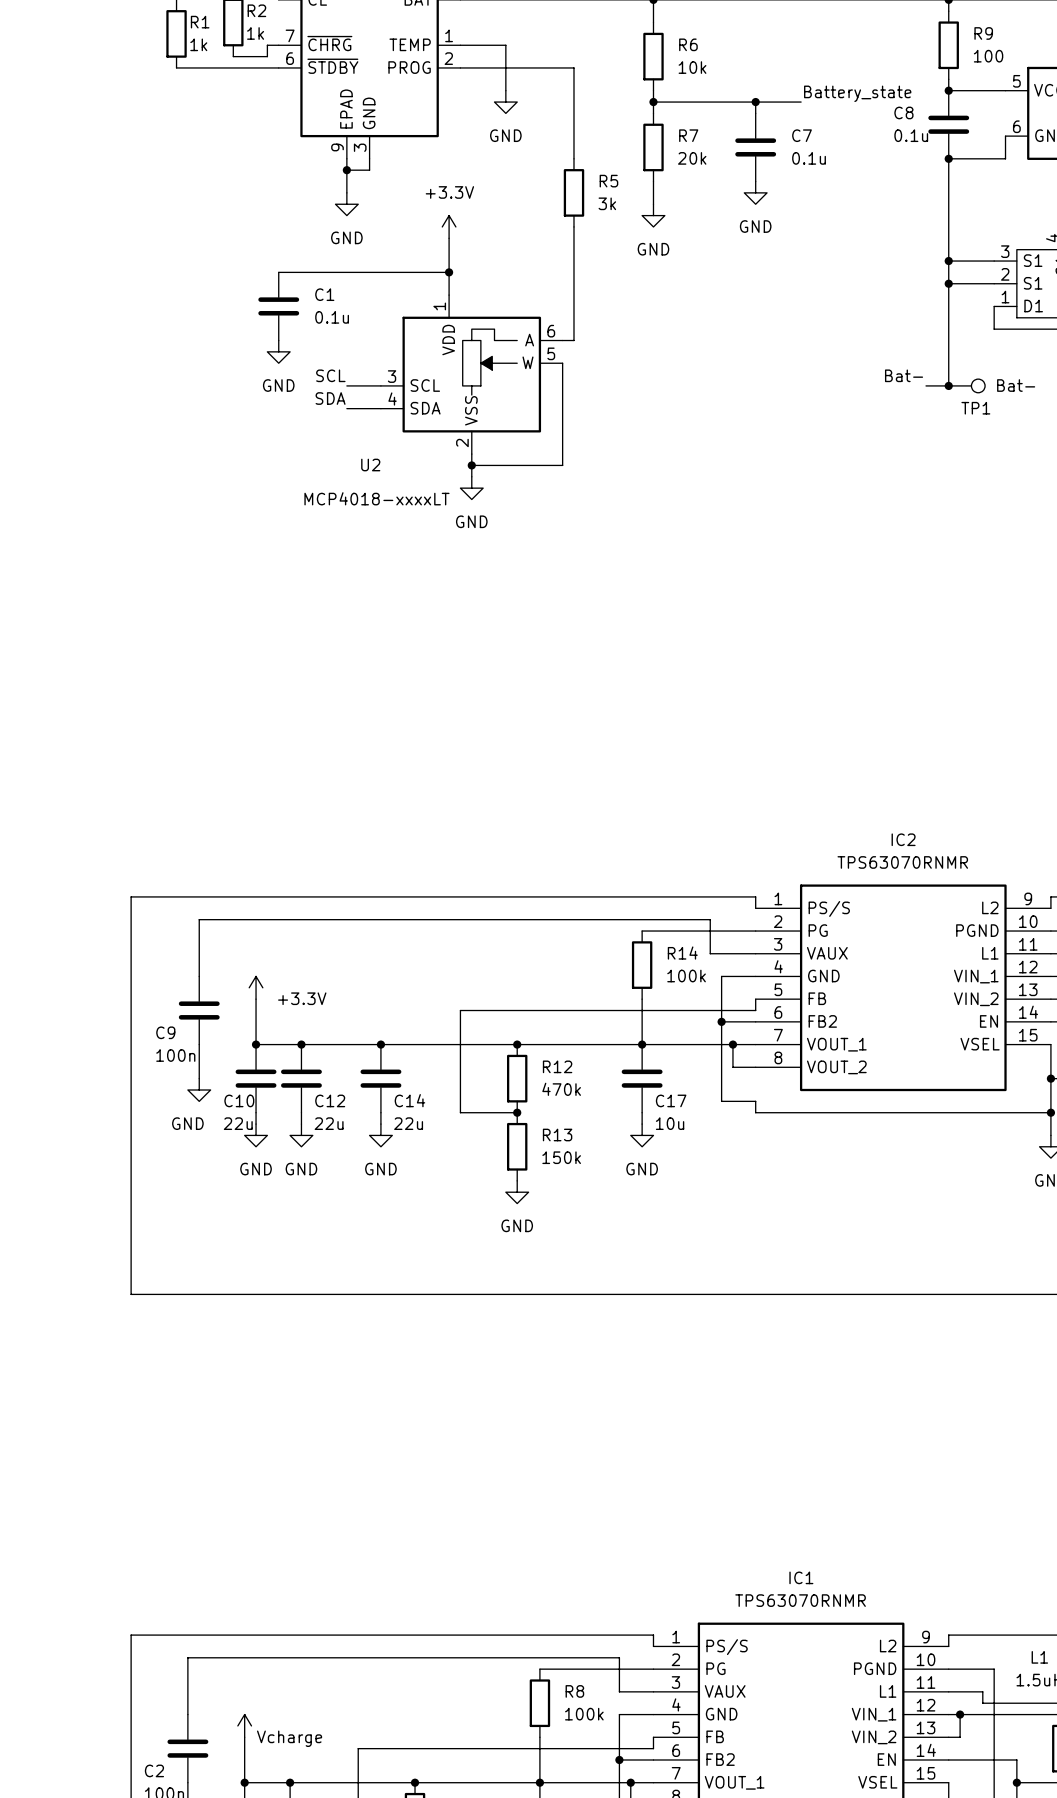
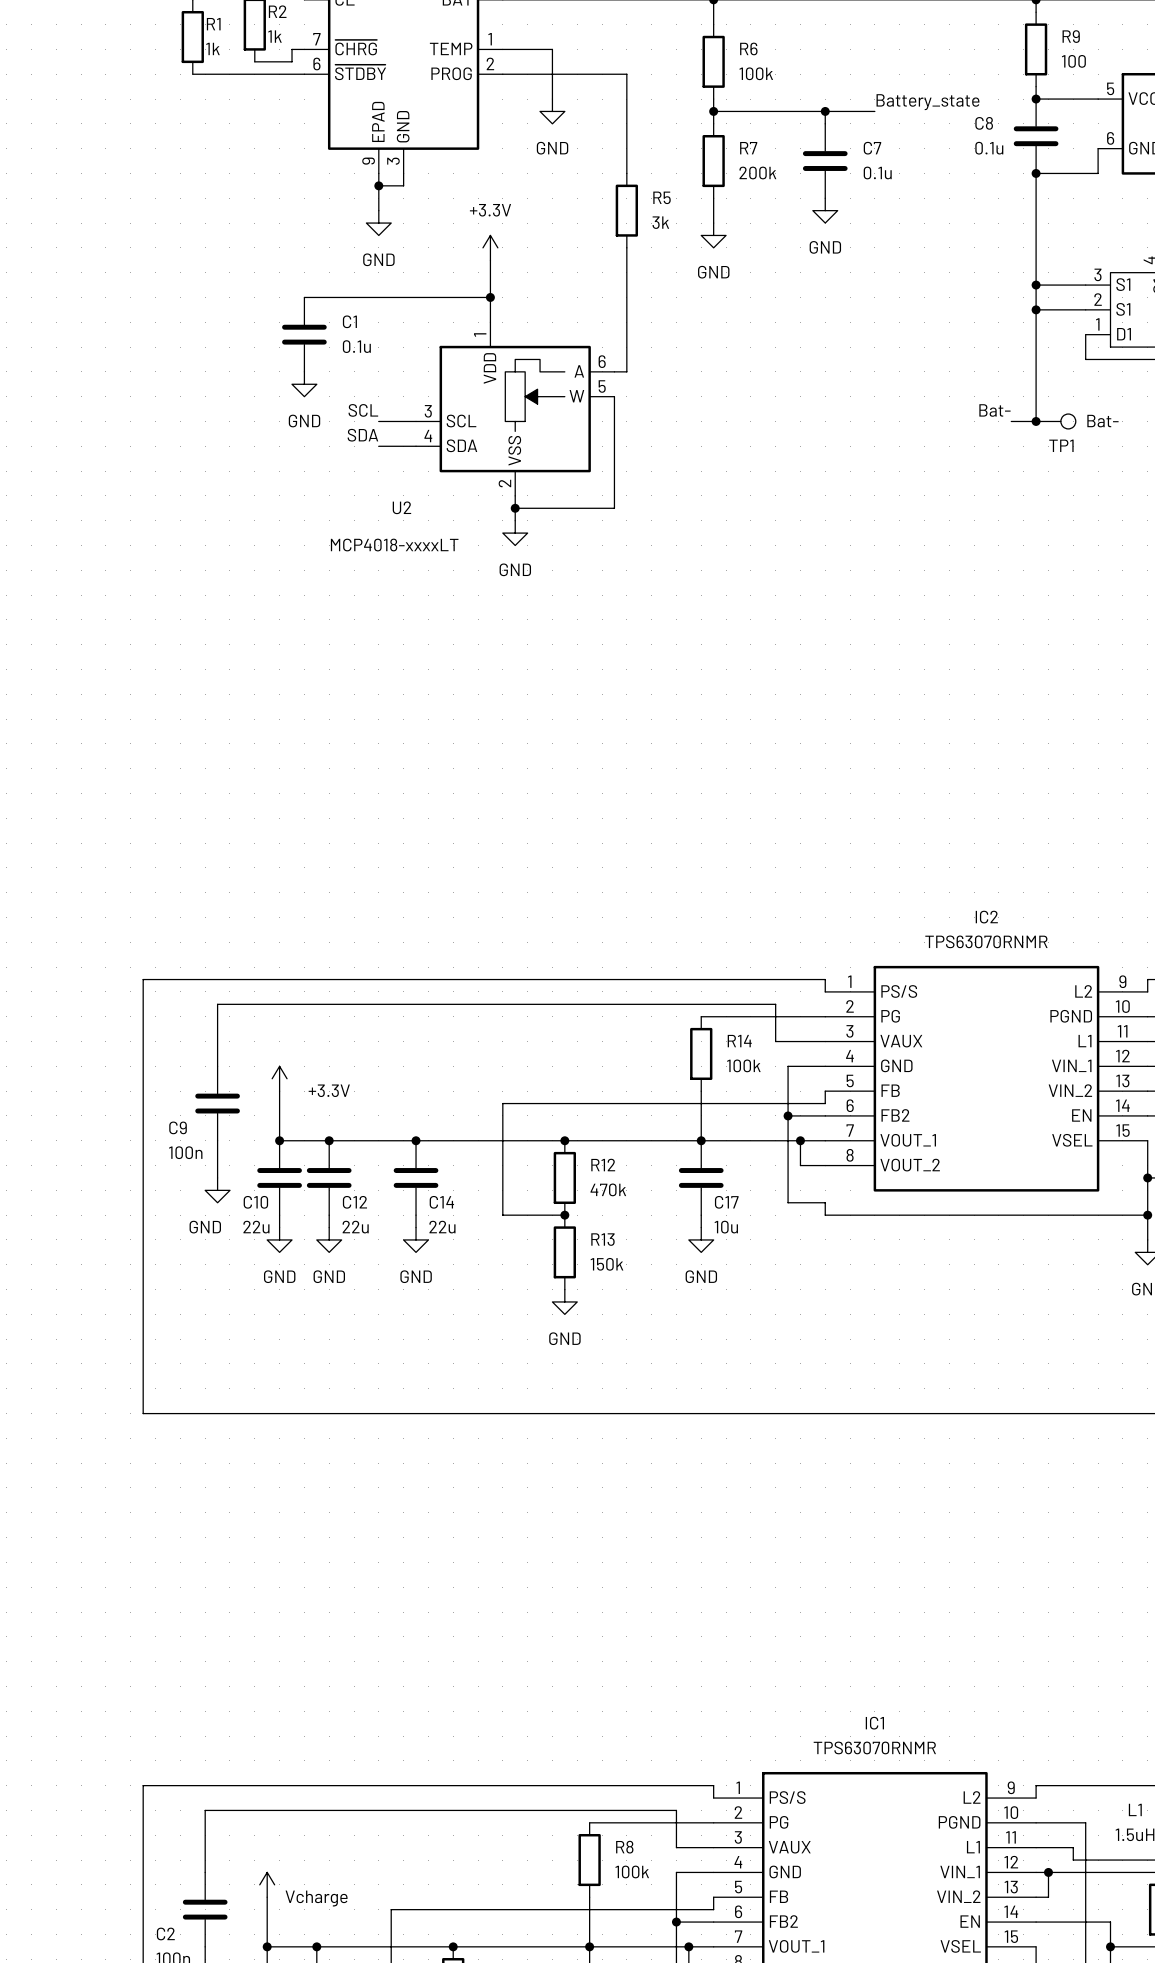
R6 value: 10k (692, 67) -> 100k (756, 73)
R7 value: 20k (692, 158) -> 200k (757, 172)

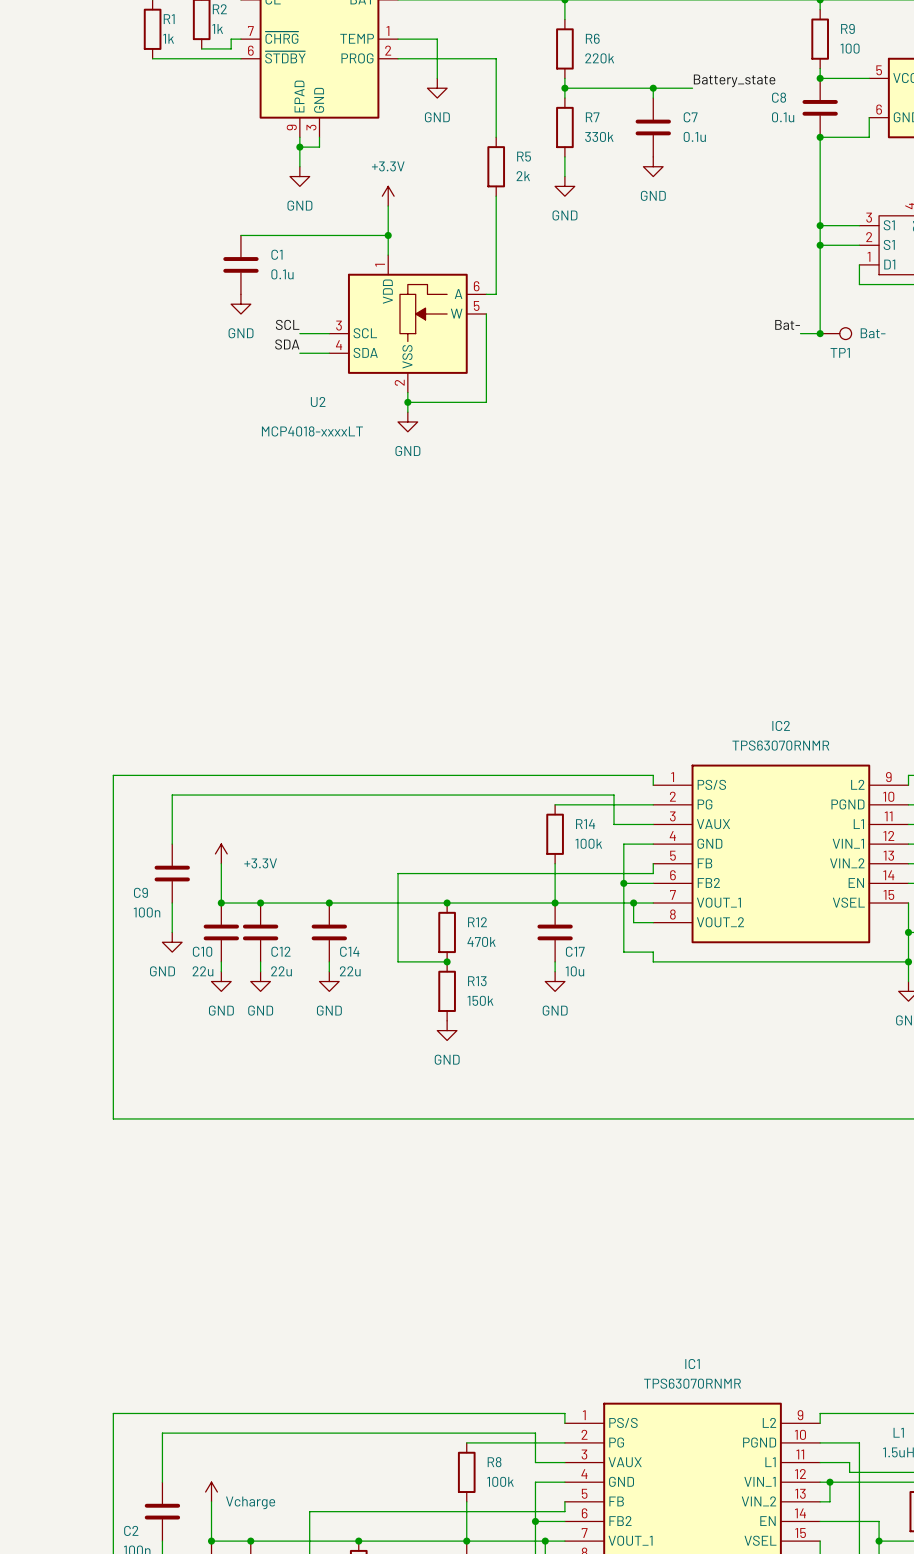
R6 value: 100k (756, 73) -> 220k (599, 58)
R7 value: 200k (757, 172) -> 330k (599, 136)
R5 value: 3k (660, 222) -> 2k (523, 176)

